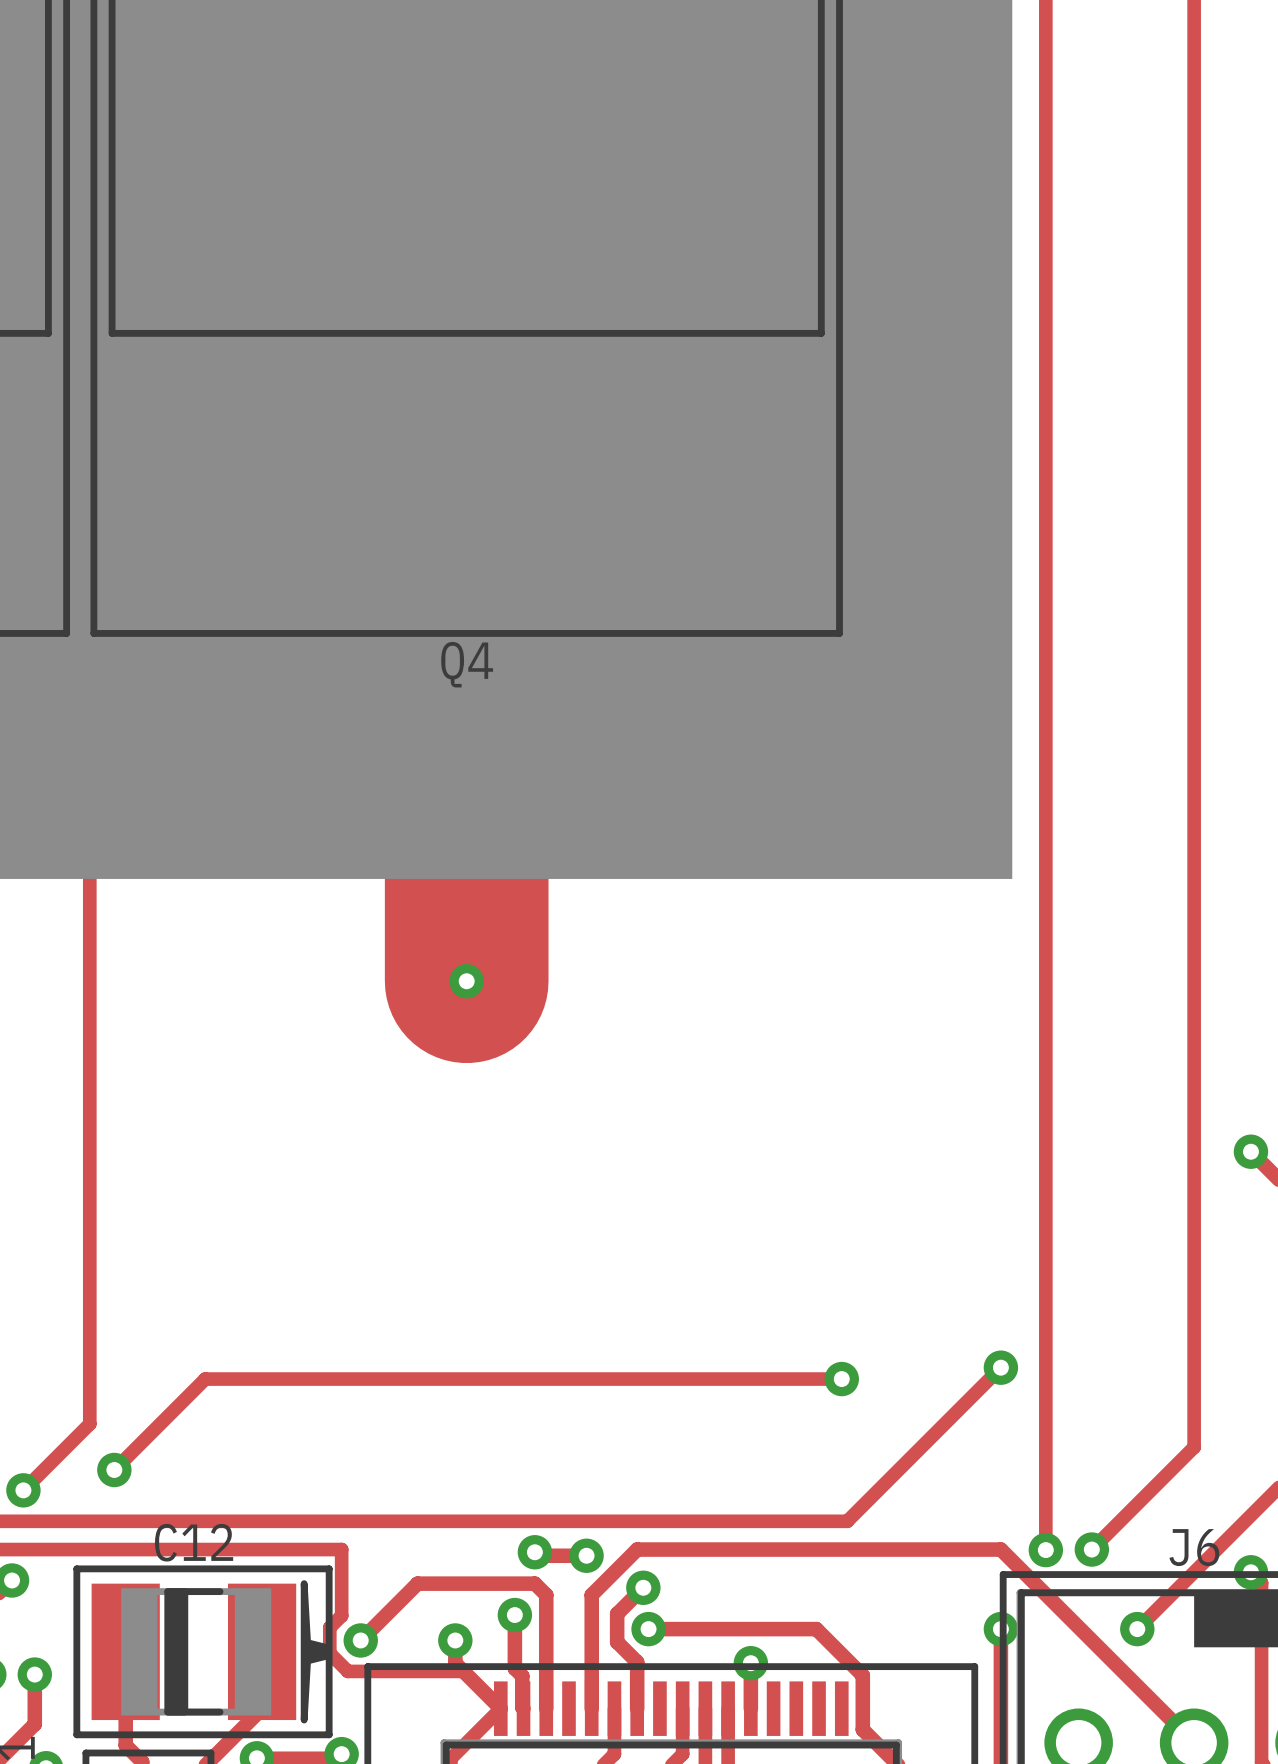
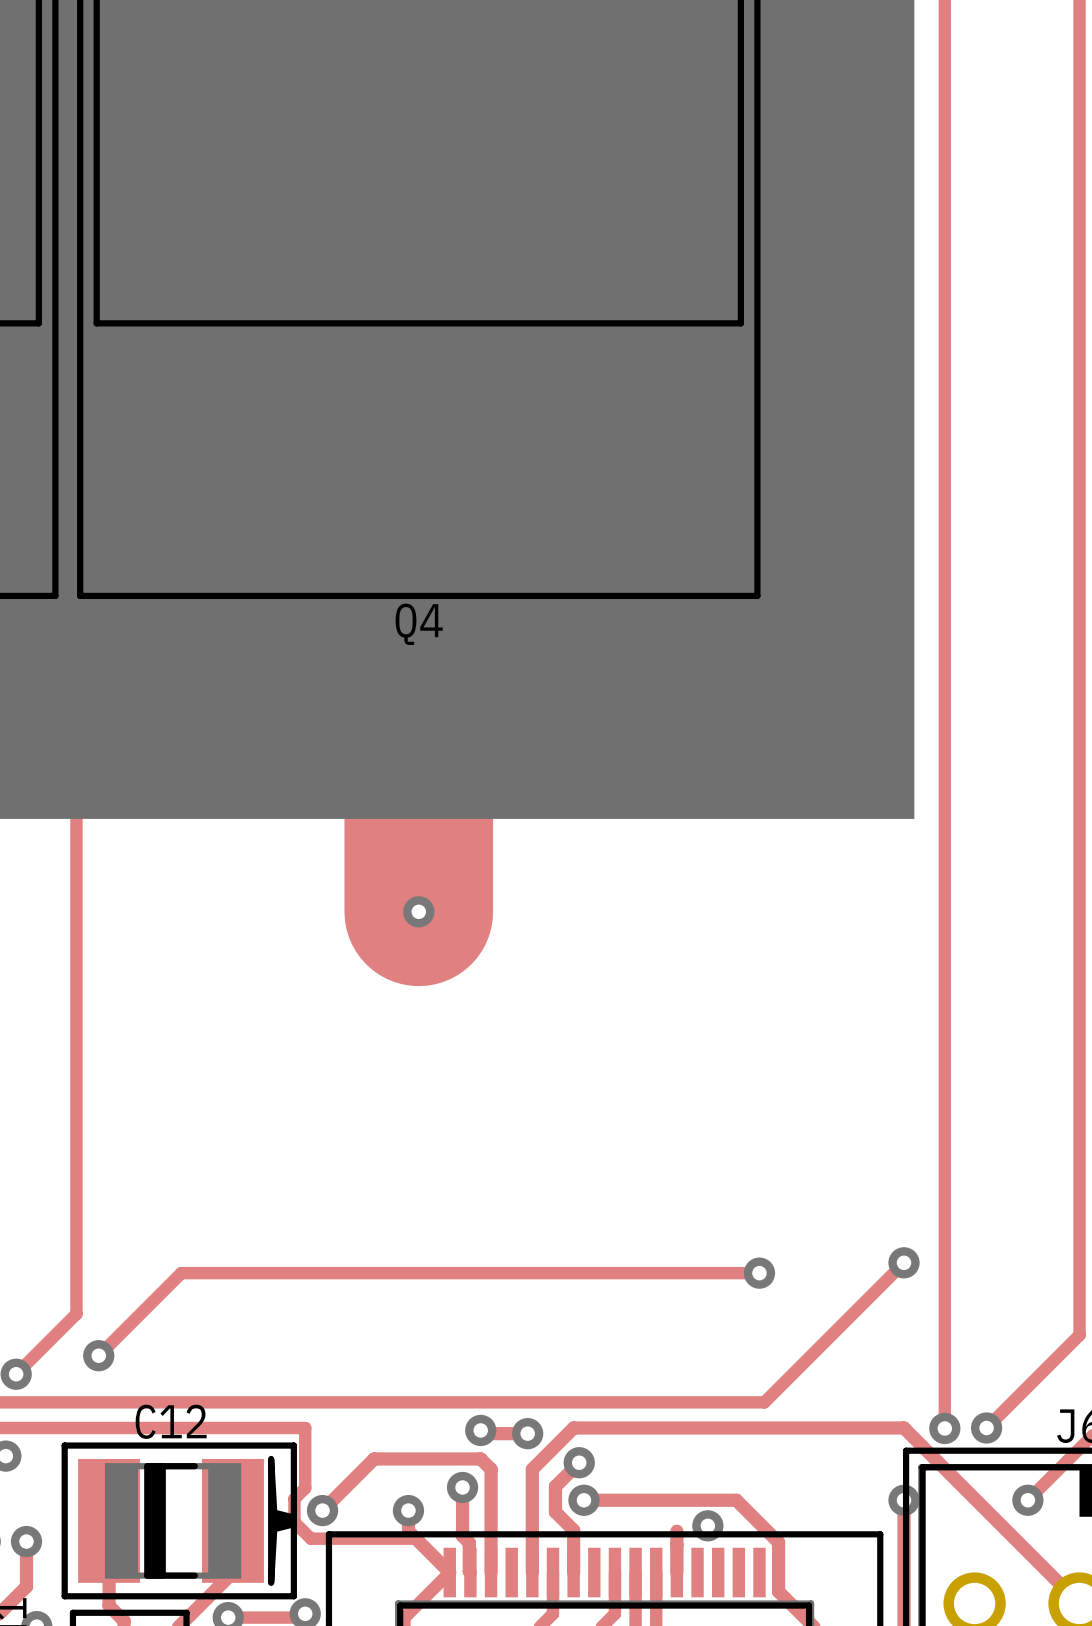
via position: (750, 1663) -> (707, 1525)

